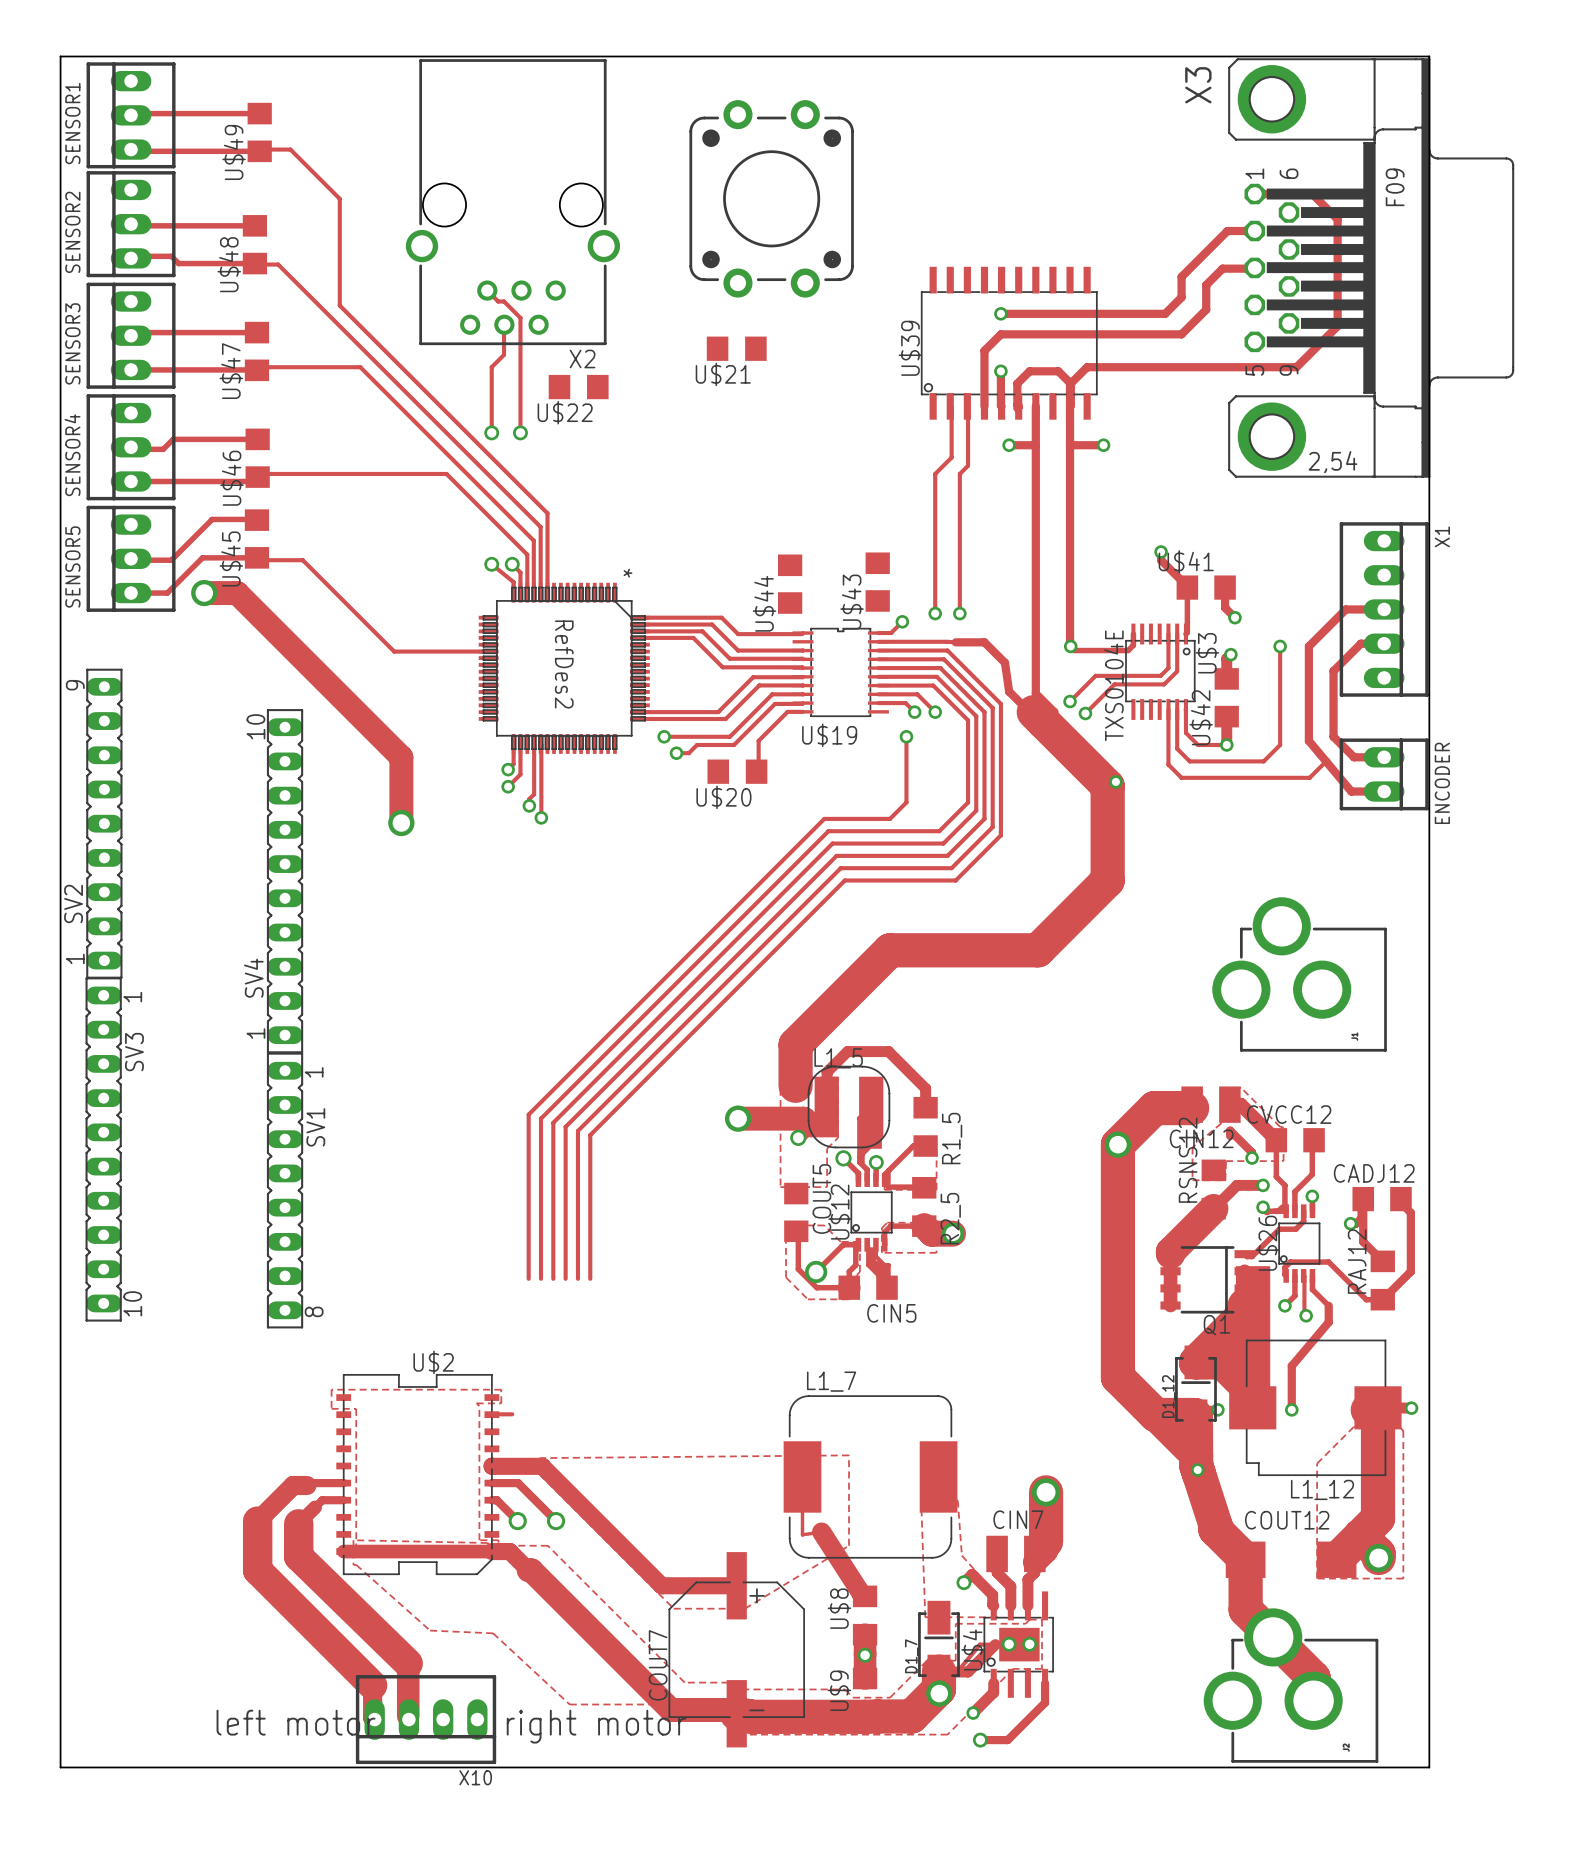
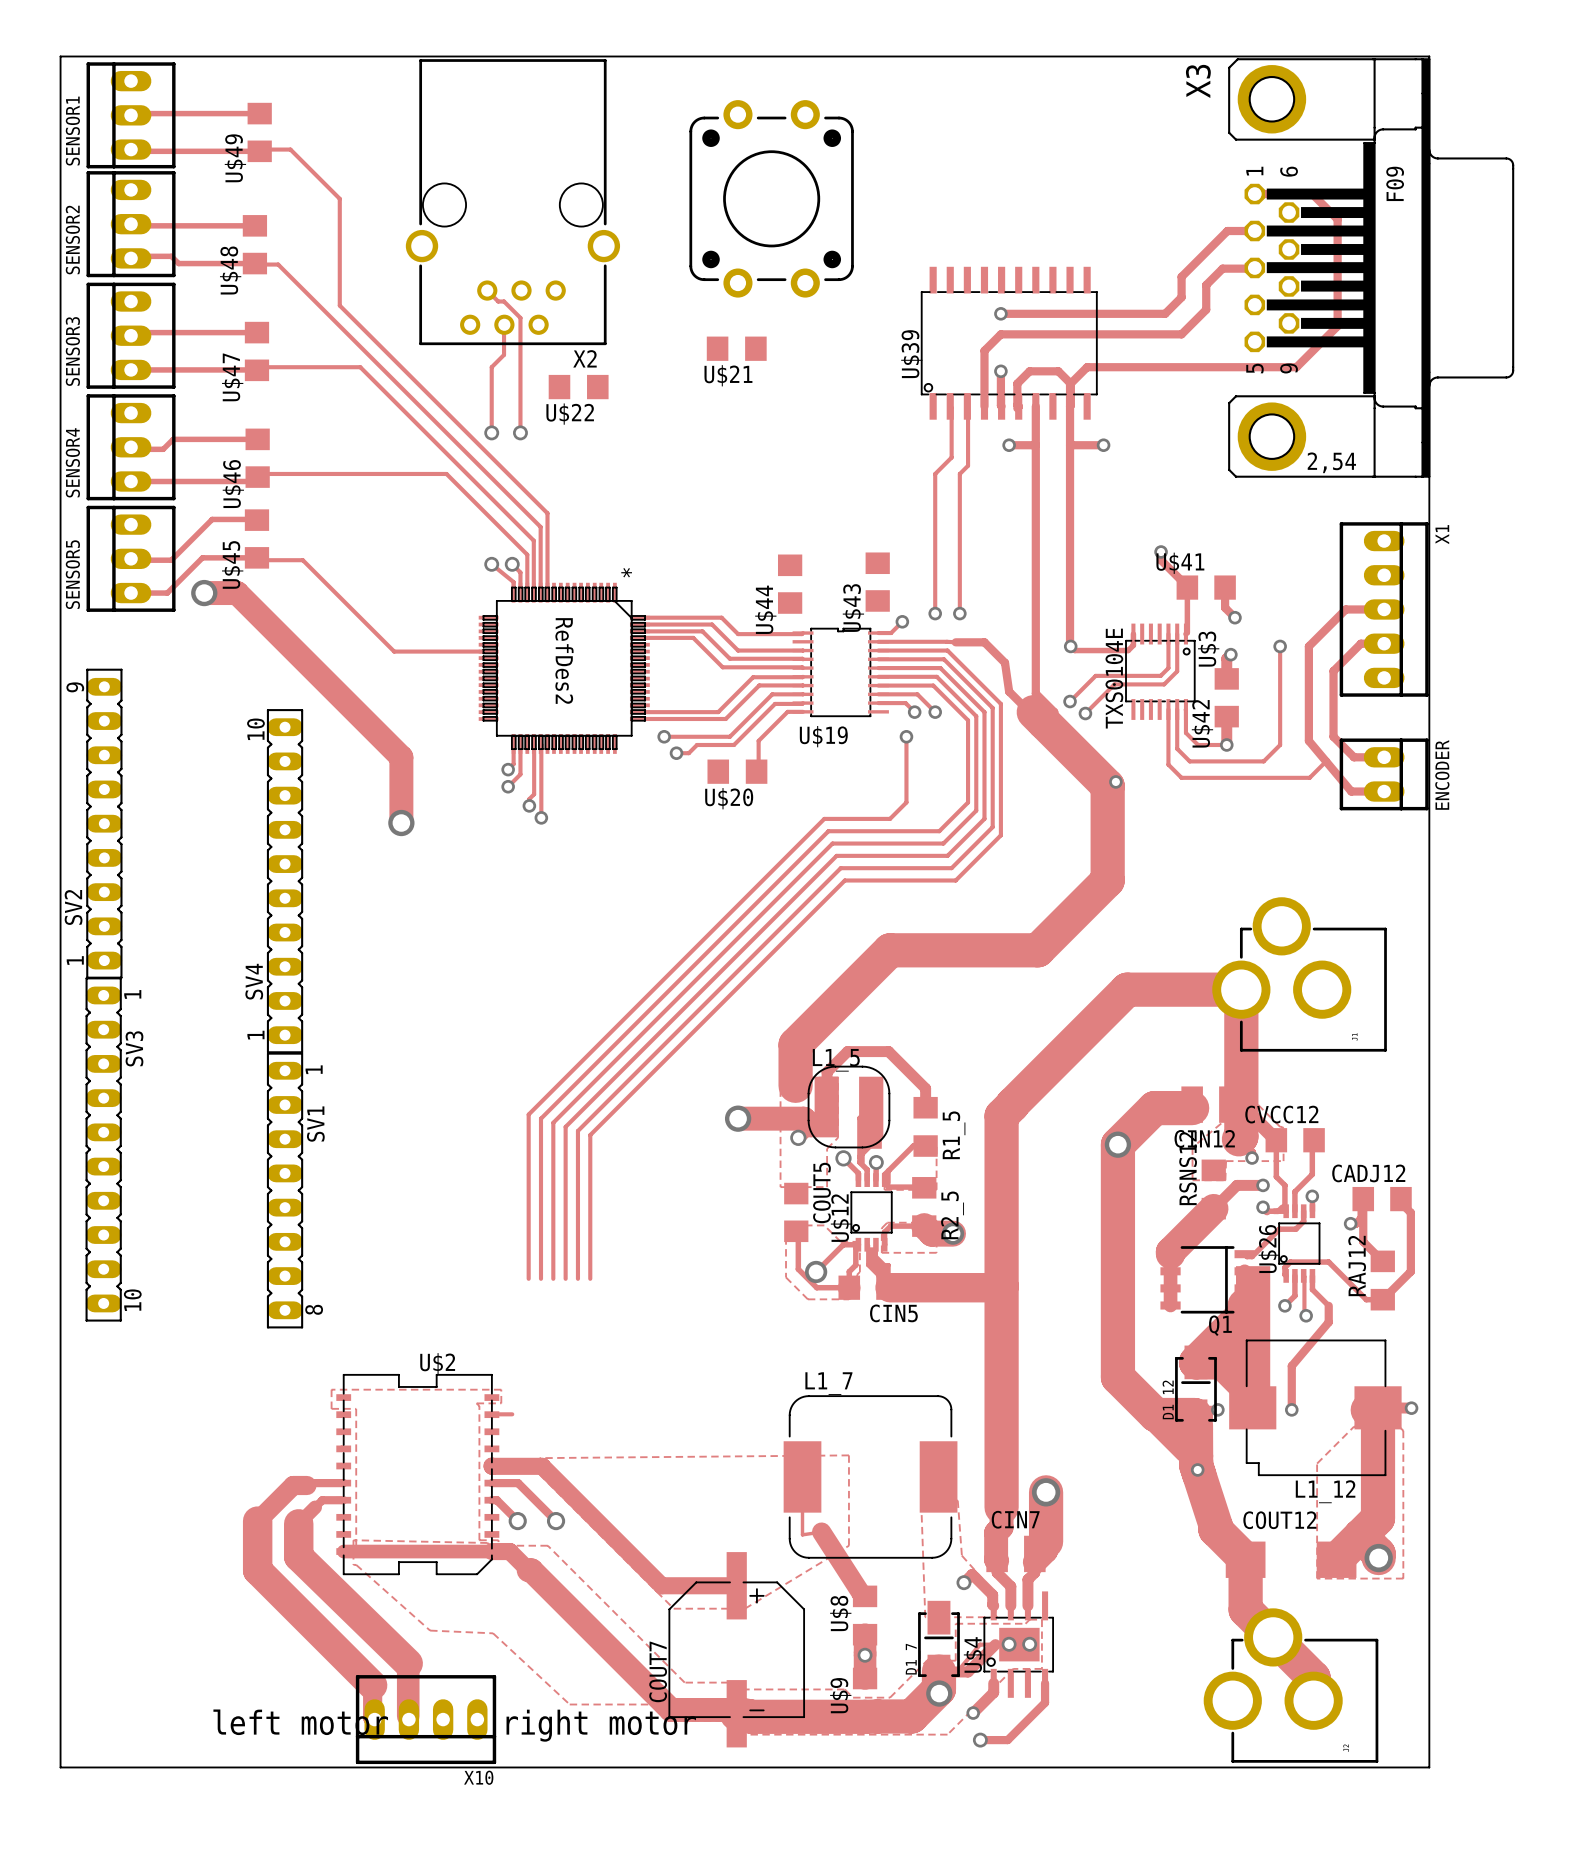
track: none -> (1238, 1139) (1241, 1136) (1241, 989) (1127, 989) (1001, 1115) (1001, 1527) (996, 1532) (997, 1560)
track: none -> (890, 1287) (1002, 1287)

